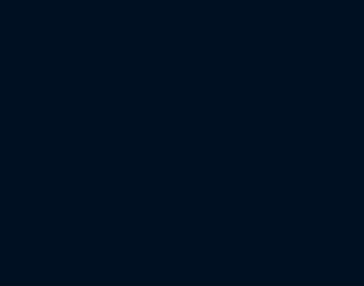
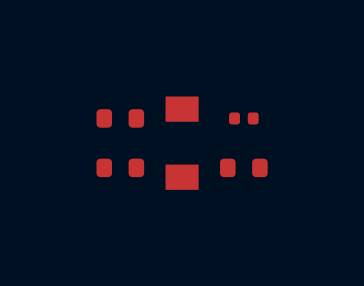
part: none -> (120, 118)
part: none -> (243, 118)
part: none -> (182, 143)
part: none -> (120, 167)
part: none -> (243, 167)

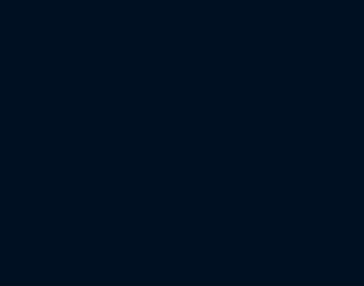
part: (120, 118) -> none
part: (243, 118) -> none
part: (182, 143) -> none
part: (120, 167) -> none
part: (243, 167) -> none

